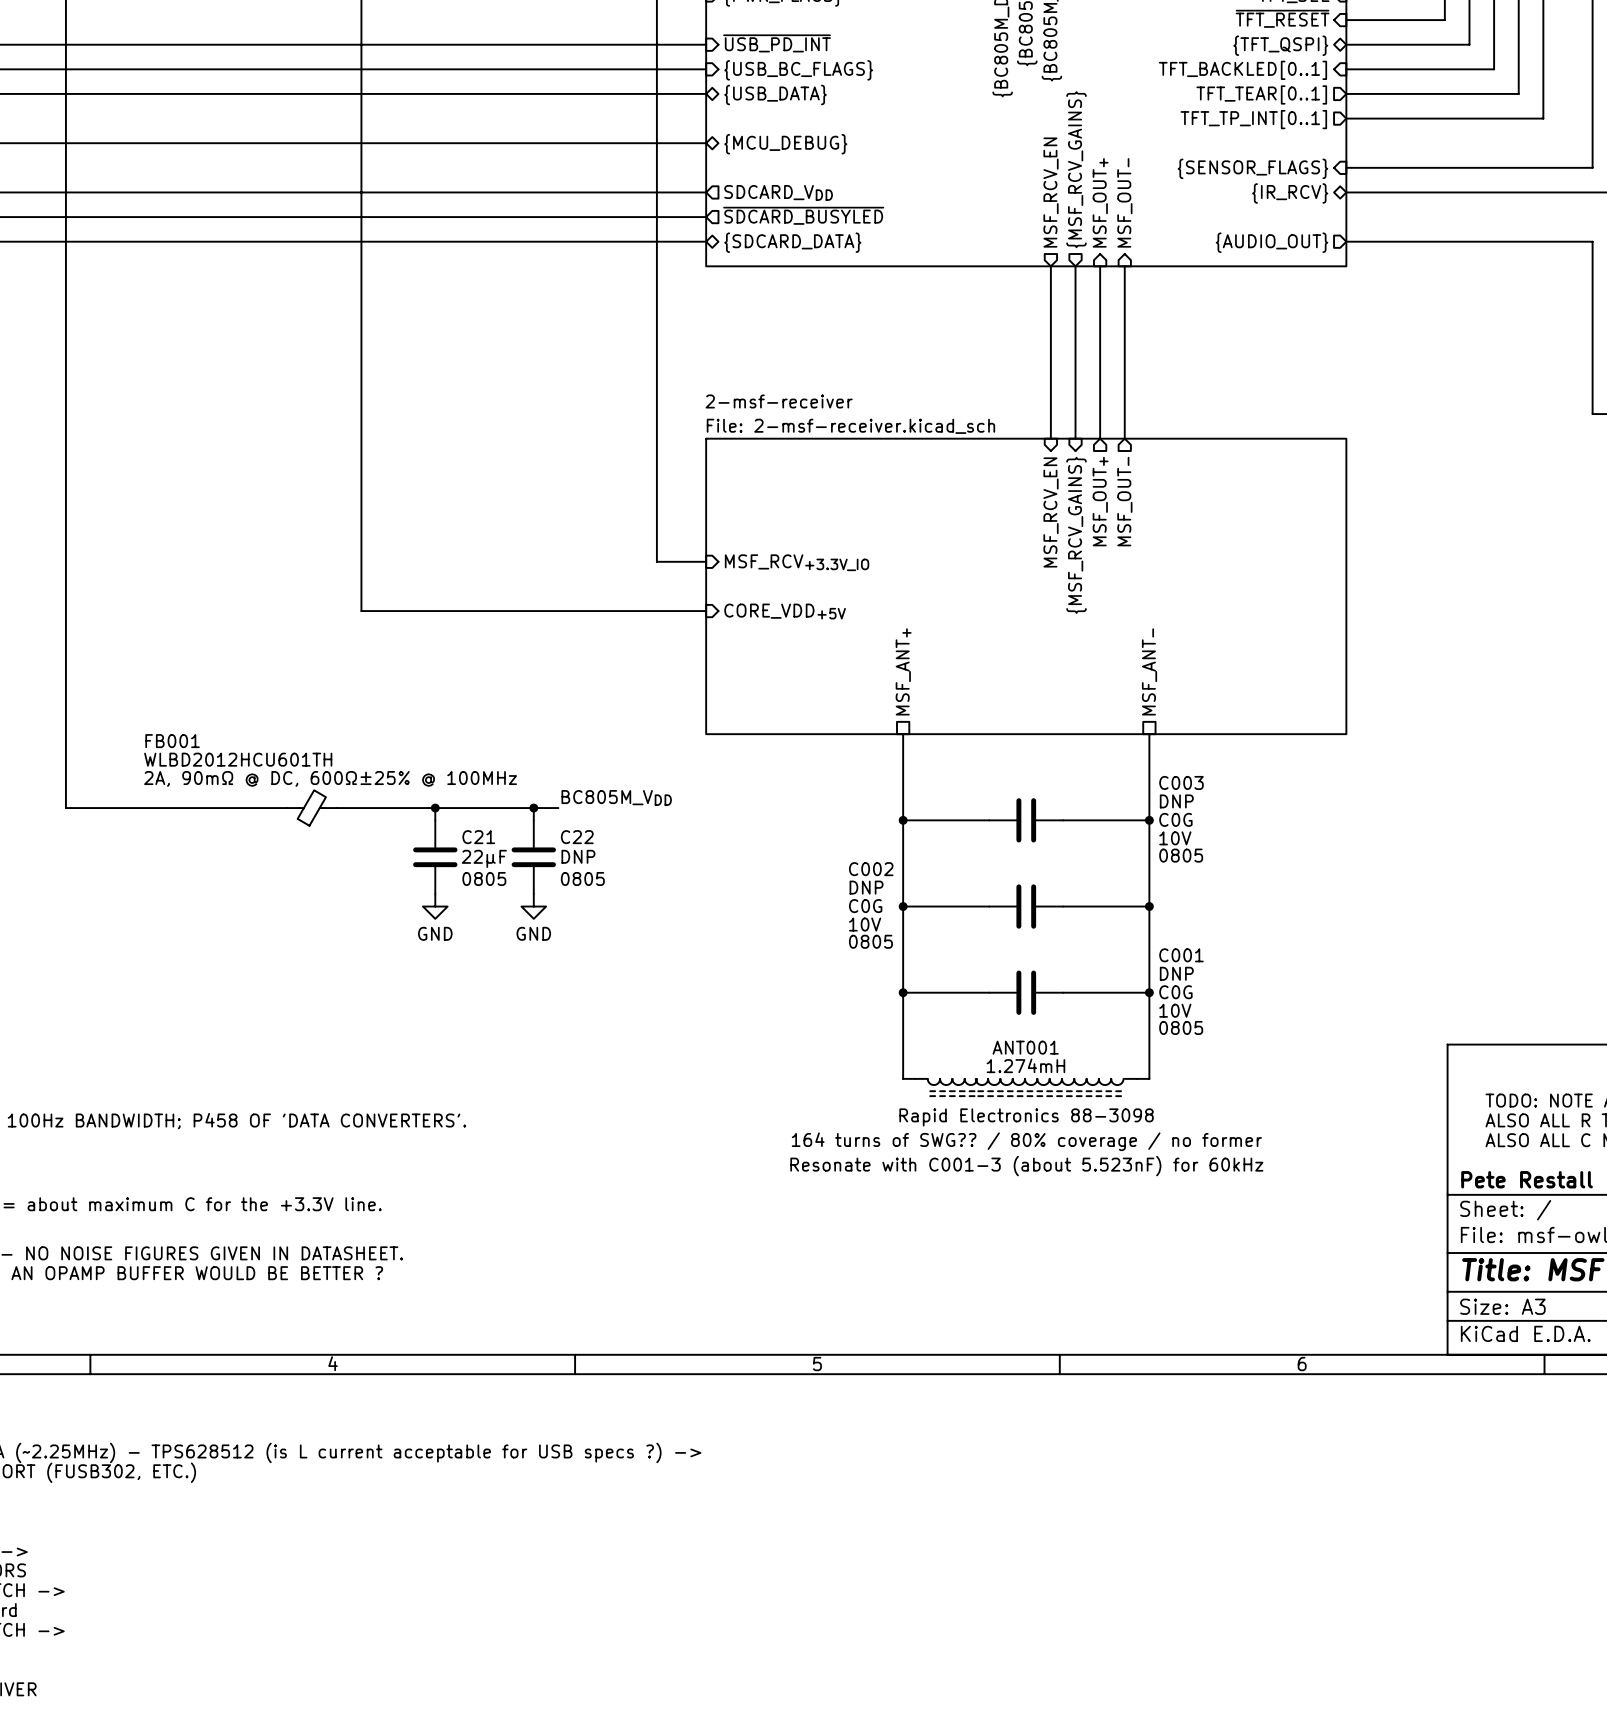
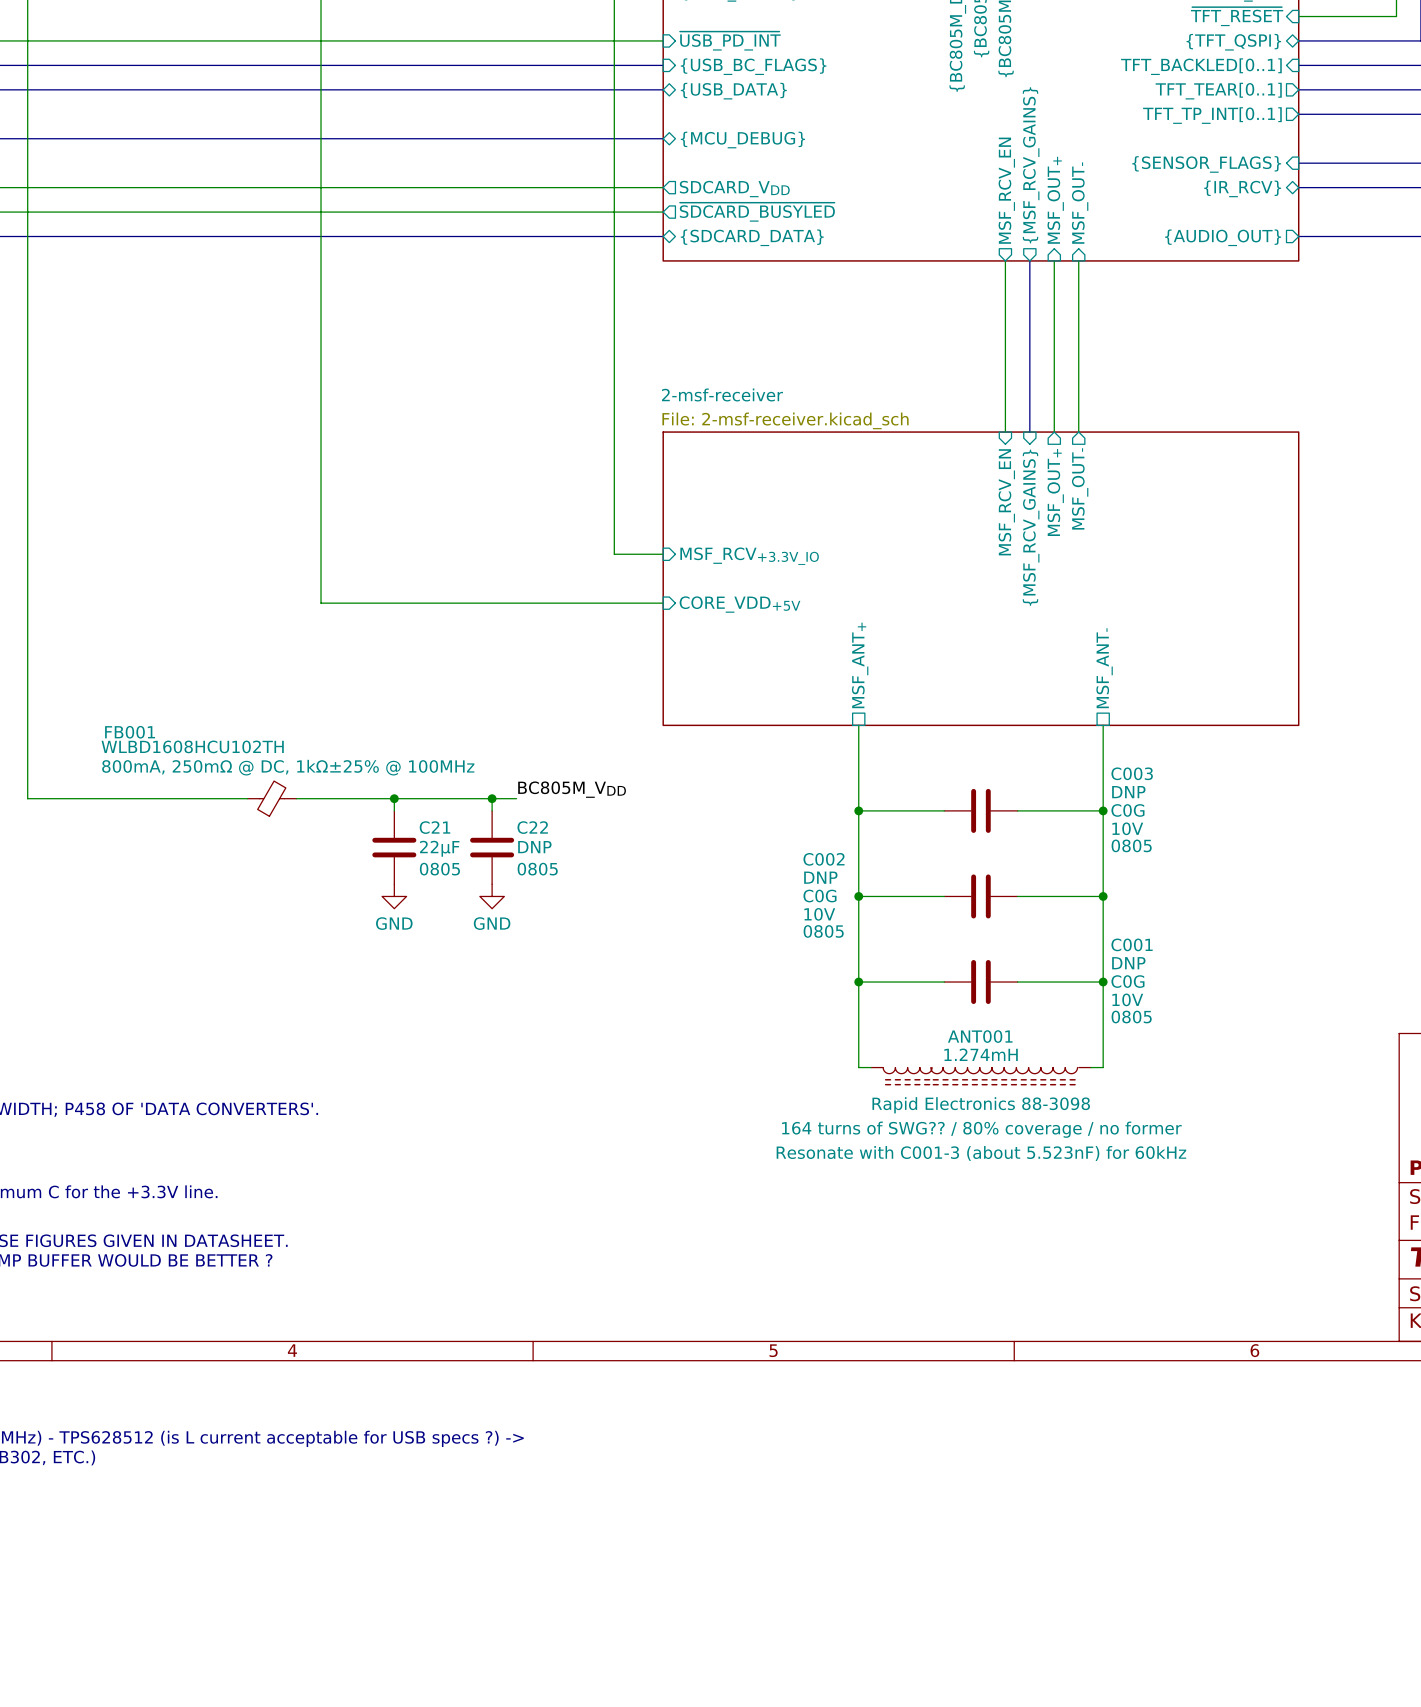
FB001 value: WLBD2012HCU601TH (238, 759) -> WLBD1608HCU102TH (192, 746)
FB001 text: 2A, 90mΩ @ DC, 600Ω±25% @ 100MHz (330, 778) -> 800mA, 250mΩ @ DC, 1kΩ±25% @ 100MHz (288, 767)

